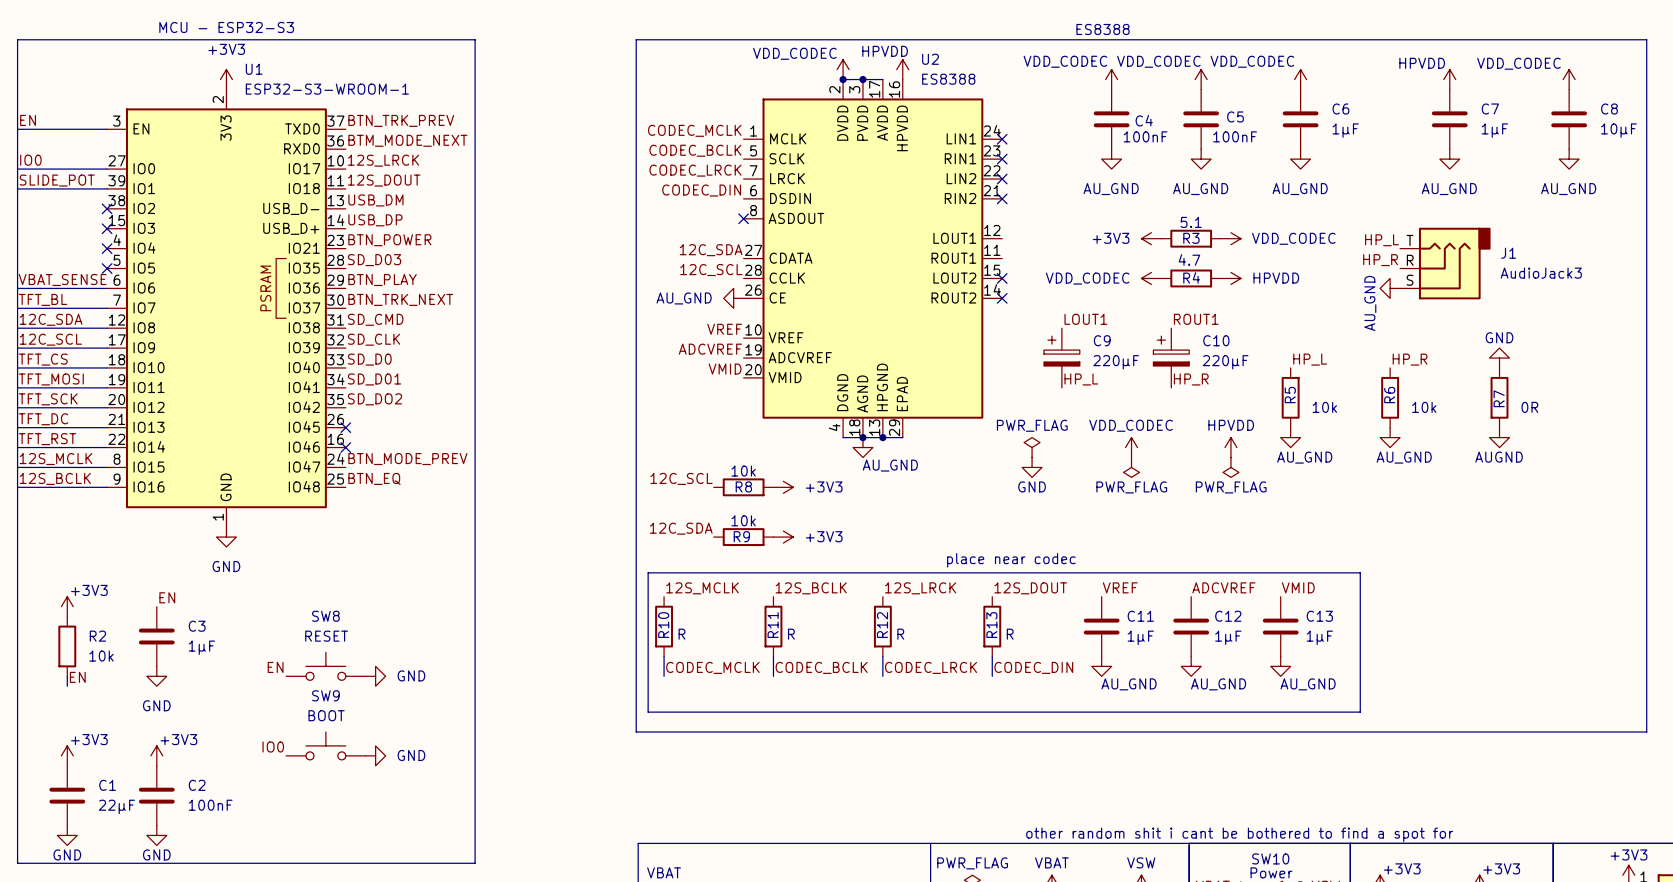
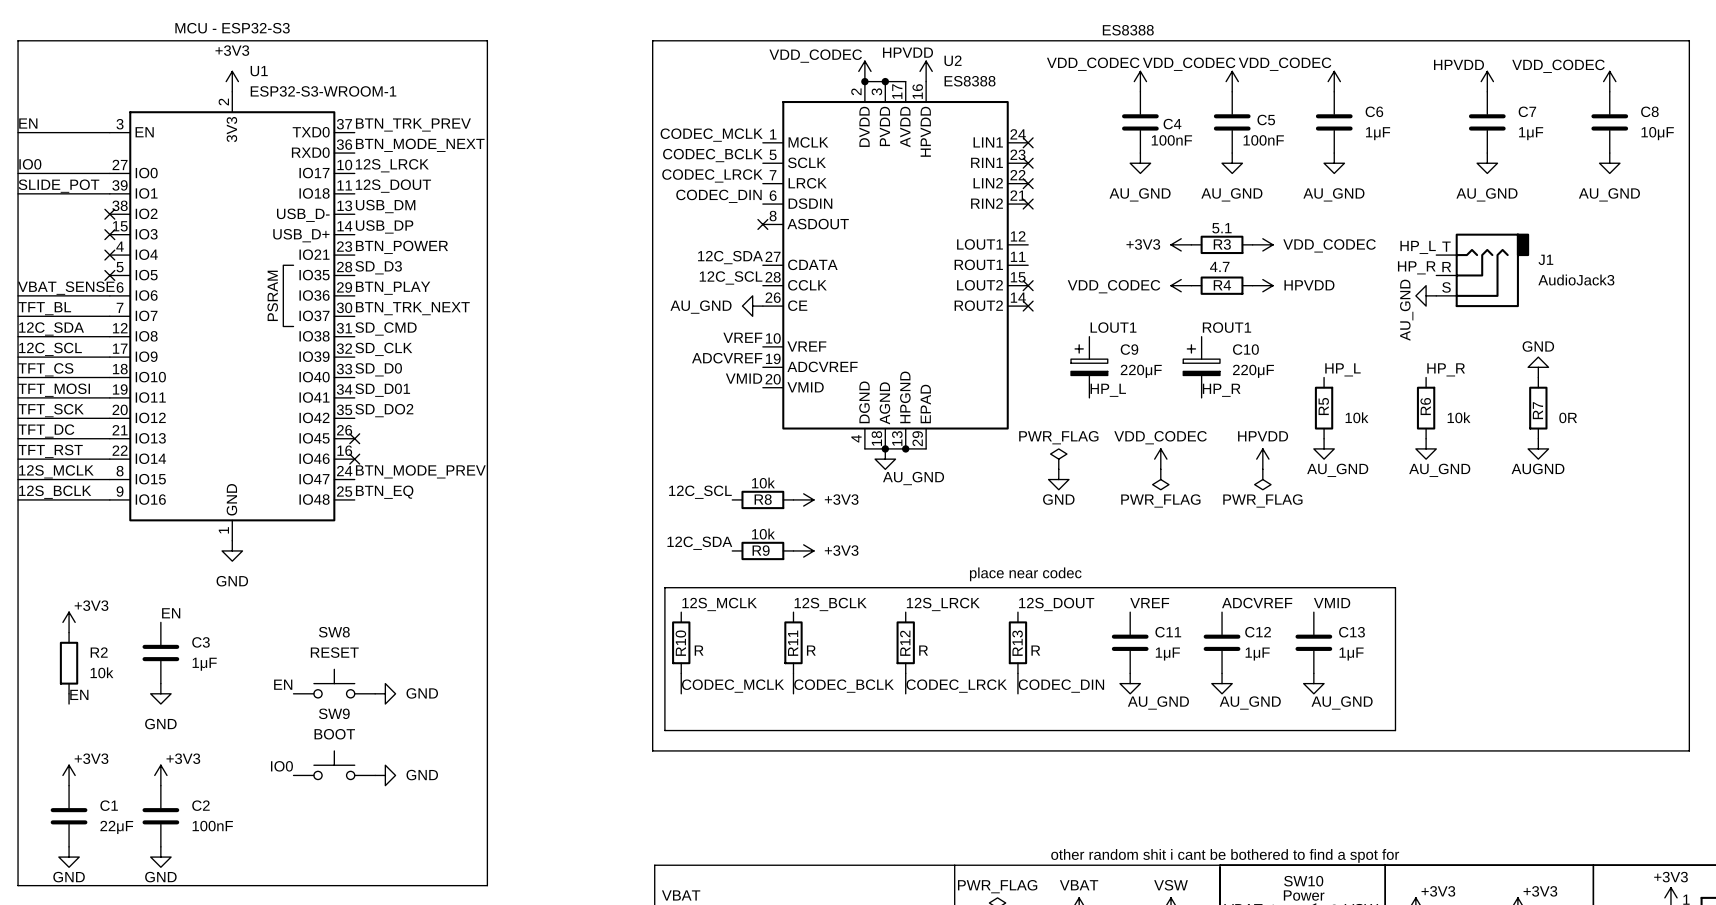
label: BTM_MODE_NEXT (407, 140) -> BTN_MODE_NEXT (420, 145)
label: SD_D03 (374, 260) -> SD_D3 (378, 267)

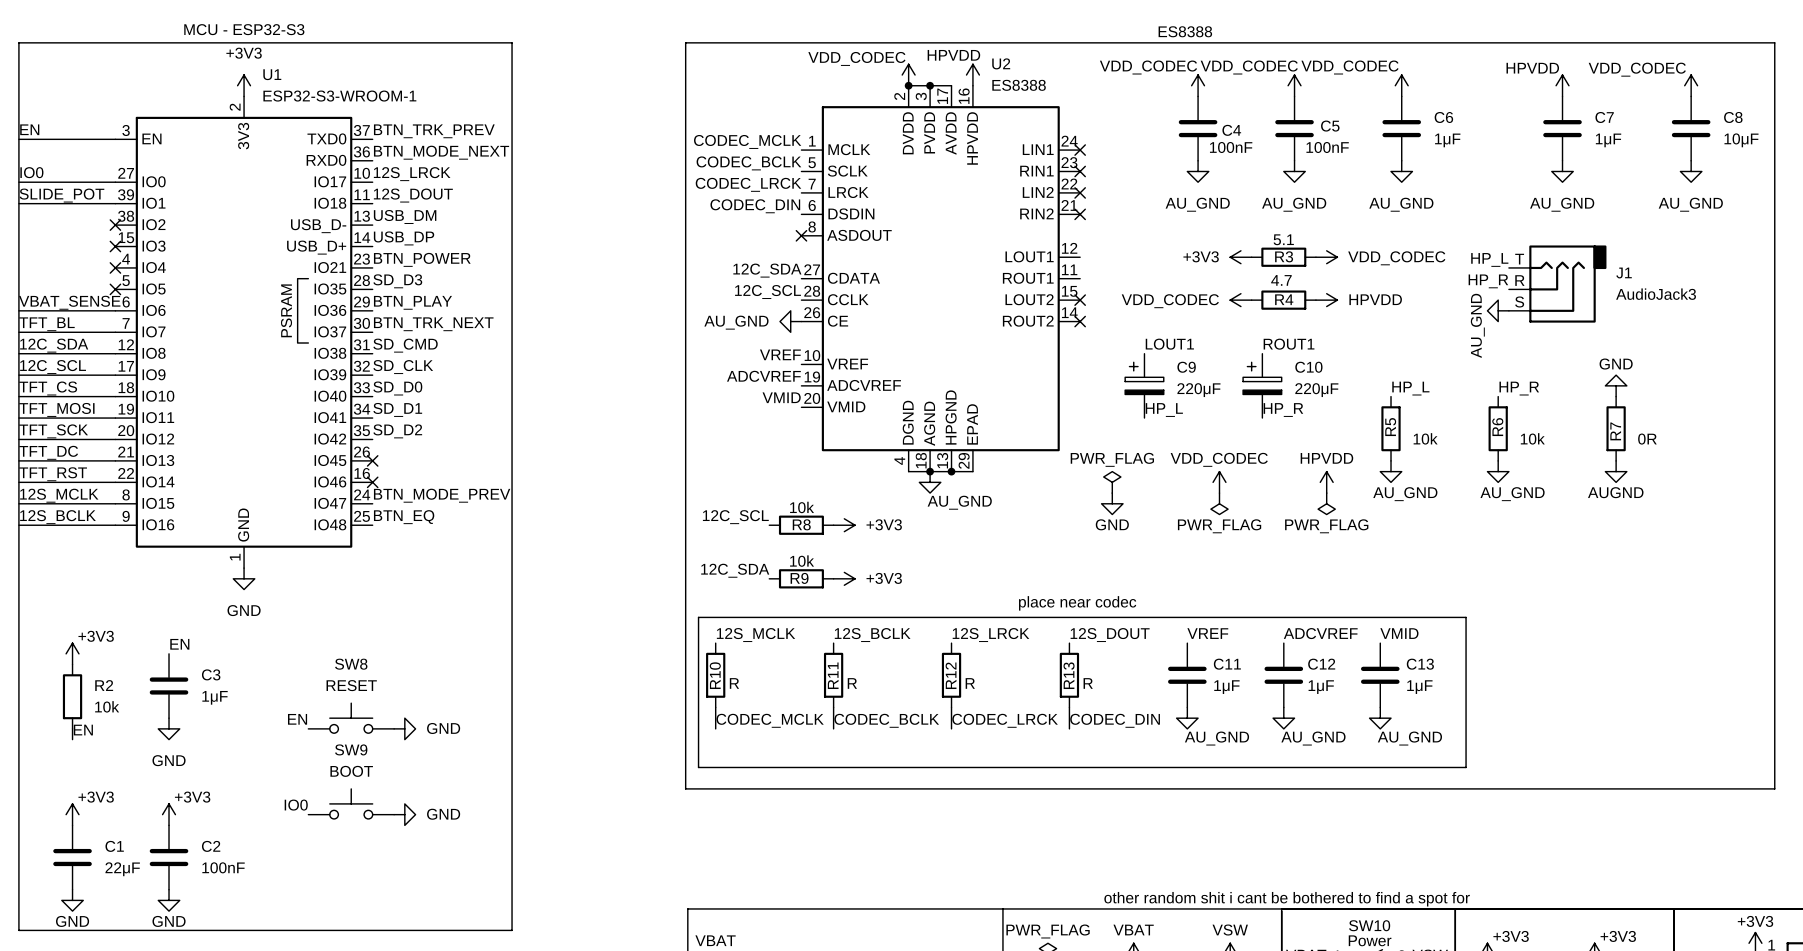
label: SD_D01 (382, 390) -> SD_D1 (397, 409)
label: SD_DO2 (384, 410) -> SD_D2 (397, 431)

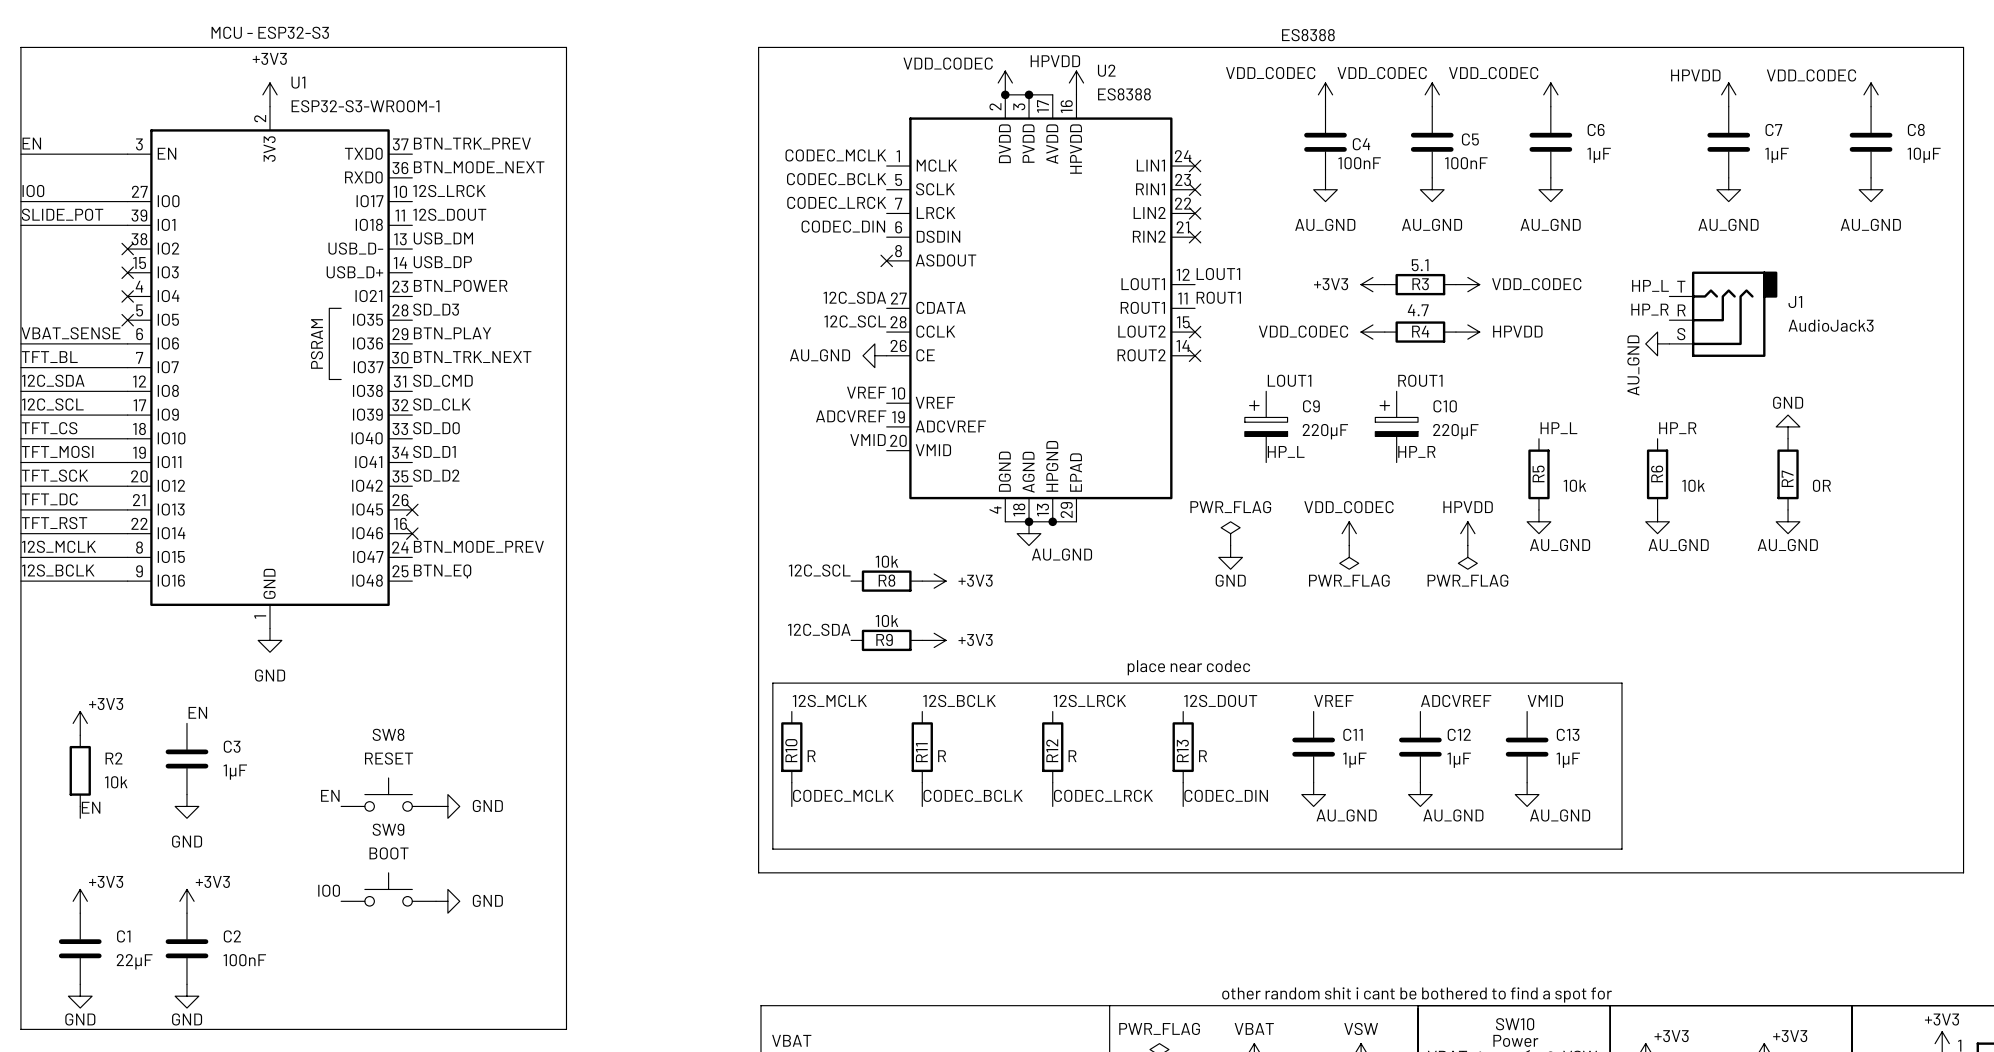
label: none -> LOUT1 (1218, 274)
label: none -> ROUT1 (1218, 297)
power symbol: AUGND (1616, 471) -> AU_GND (1788, 521)

